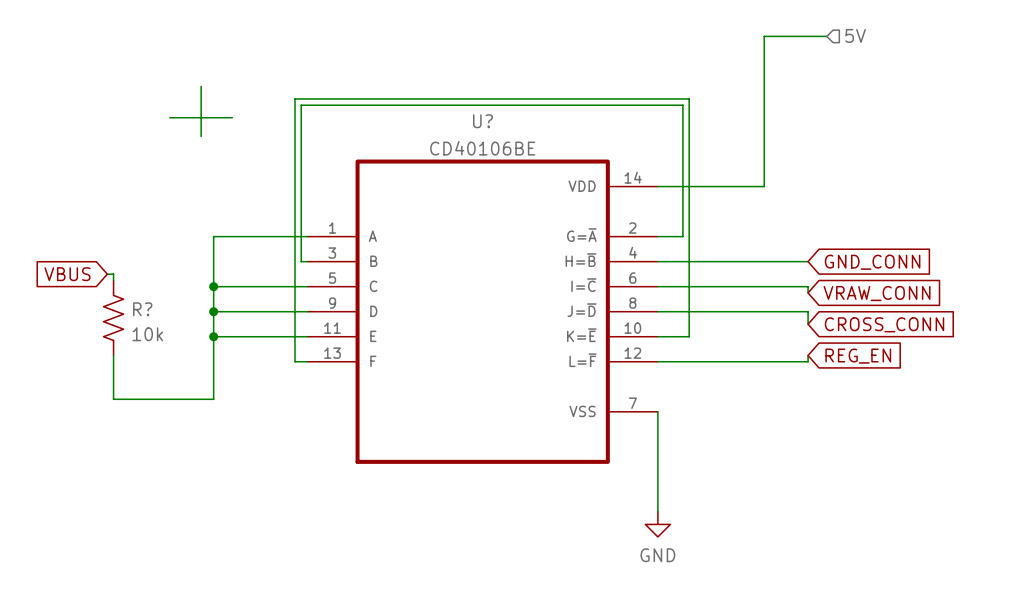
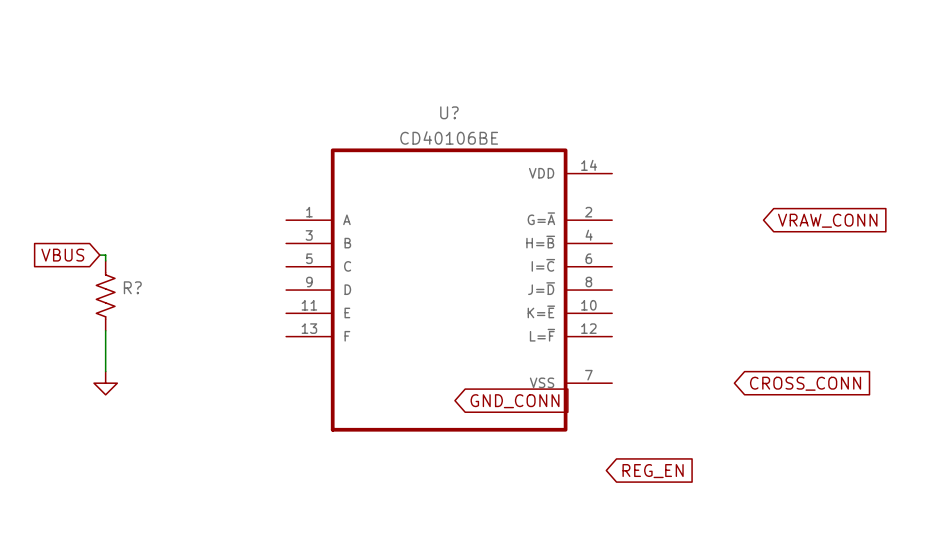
hierarchical label: 5V (855, 35) -> none
wire: (826, 36) (764, 36) (764, 186) (657, 186) -> none
wire: (201, 86) (201, 136) -> none
wire: (169, 117) (232, 117) -> none
wire: (307, 236) (213, 236) (213, 399) (113, 399) -> none
wire: (657, 236) (682, 236) (682, 105) (301, 105) (301, 261) (307, 261) -> none
wire: (657, 261) (808, 261) -> none
global label: GND_CONN (872, 262) -> none
wire: (213, 286) (307, 286) -> none
junction: (213, 286) -> none
wire: (657, 286) (808, 286) (808, 292) -> none
global label position: VRAW_CONN (877, 293) -> VRAW_CONN (827, 220)
wire: (213, 311) (307, 311) -> none
junction: (213, 311) -> none
wire: (657, 311) (808, 311) (808, 324) -> none
global label position: CROSS_CONN (884, 324) -> CROSS_CONN (805, 383)
R? value: 10k (147, 334) -> none
wire: (213, 336) (307, 336) -> none
junction: (213, 336) -> none
wire: (657, 336) (689, 336) (689, 98) (295, 98) (295, 361) (307, 361) -> none
wire: (808, 355) (808, 361) (657, 361) -> none
global label position: REG_EN (858, 356) -> REG_EN (653, 471)
power symbol: none -> (105, 383)
wire: (657, 411) (657, 511) -> none
global label: none -> GND_CONN (515, 401)
power symbol: GND (657, 524) -> none

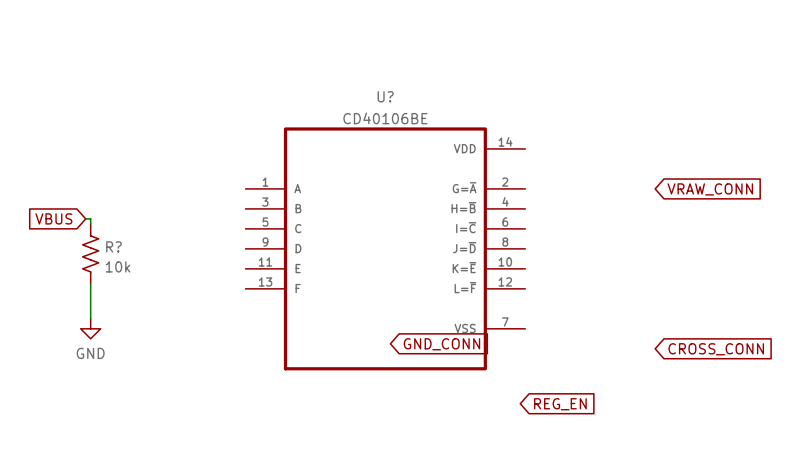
R? value: none -> 10k (118, 266)
global label position: CROSS_CONN (805, 383) -> CROSS_CONN (716, 349)
power symbol text: none -> GND (90, 353)

